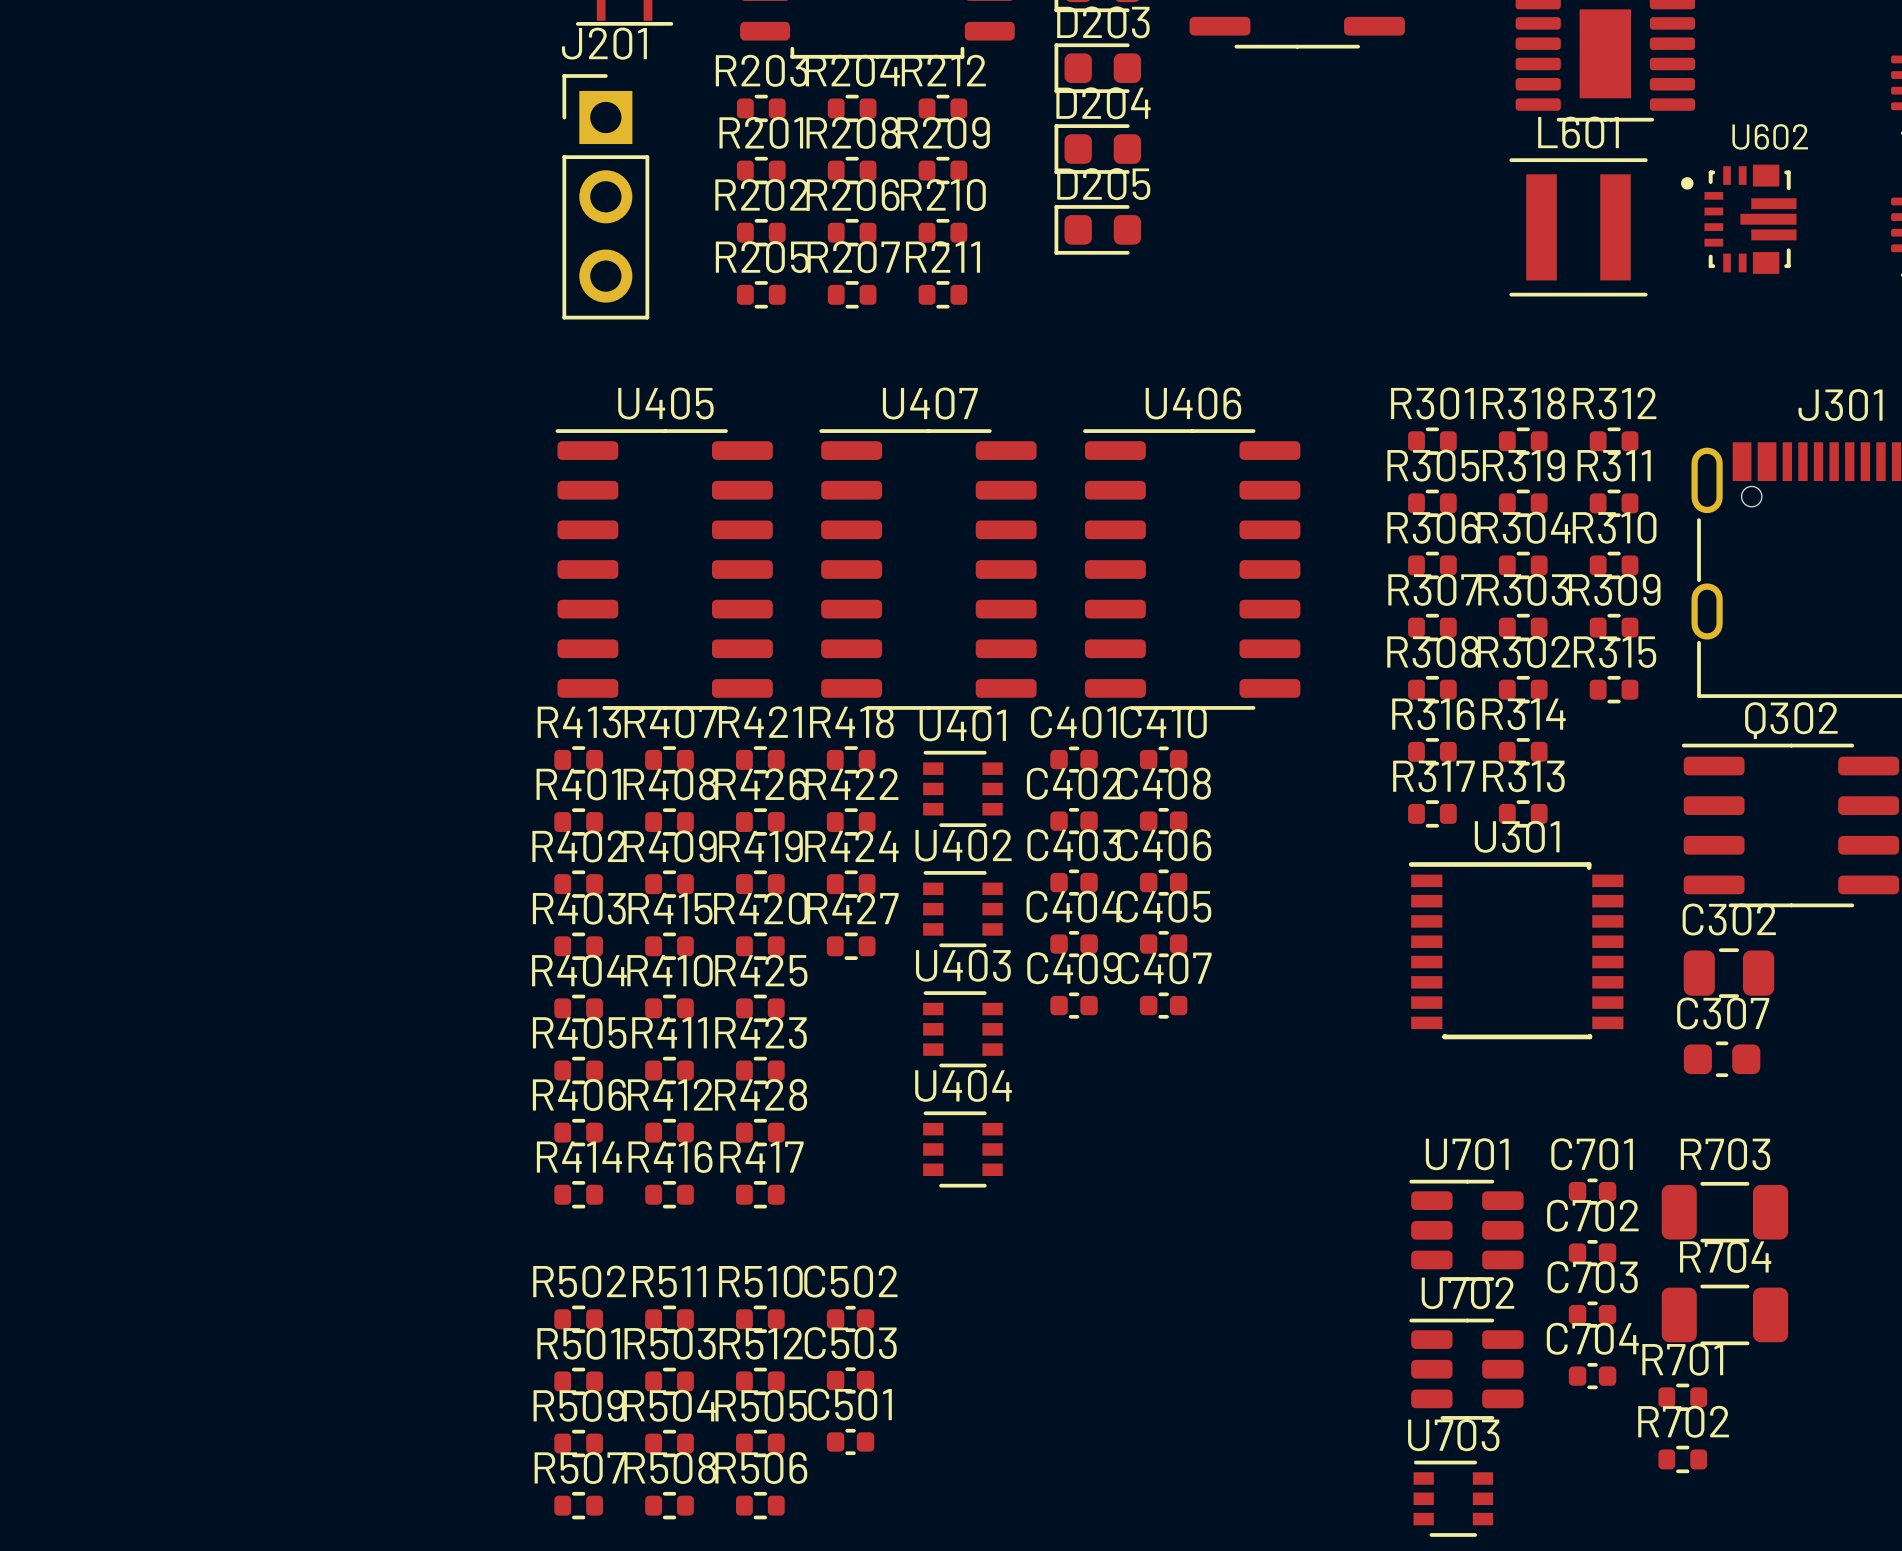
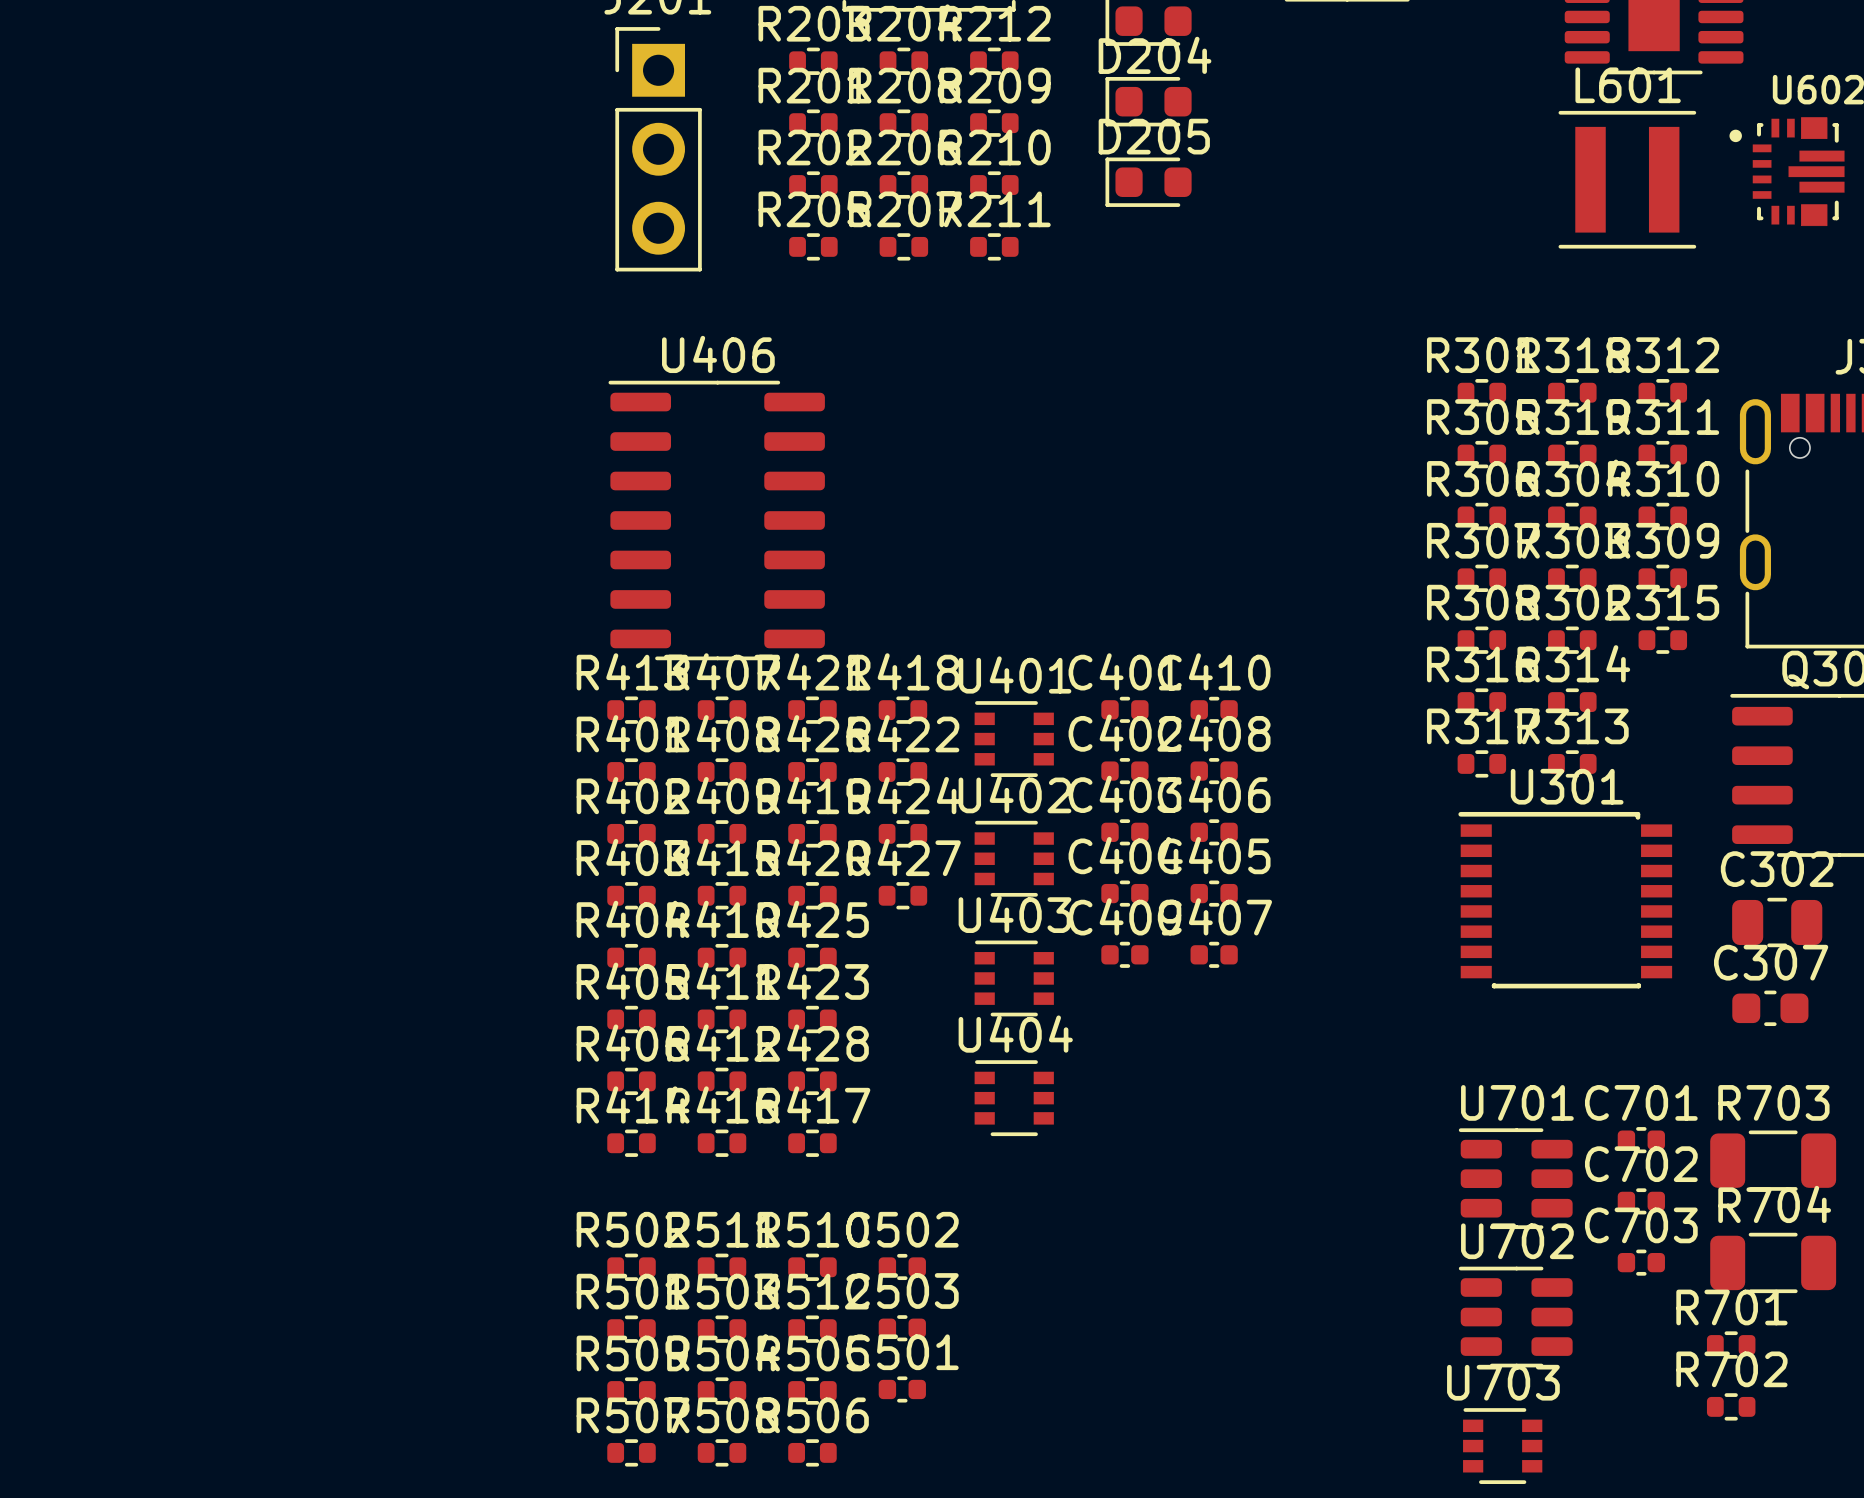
U405 name: U405 (665, 403) -> U406 (718, 354)
U407: (927, 569) -> none
U406: (1191, 569) -> none
C704: (1592, 1376) -> none

